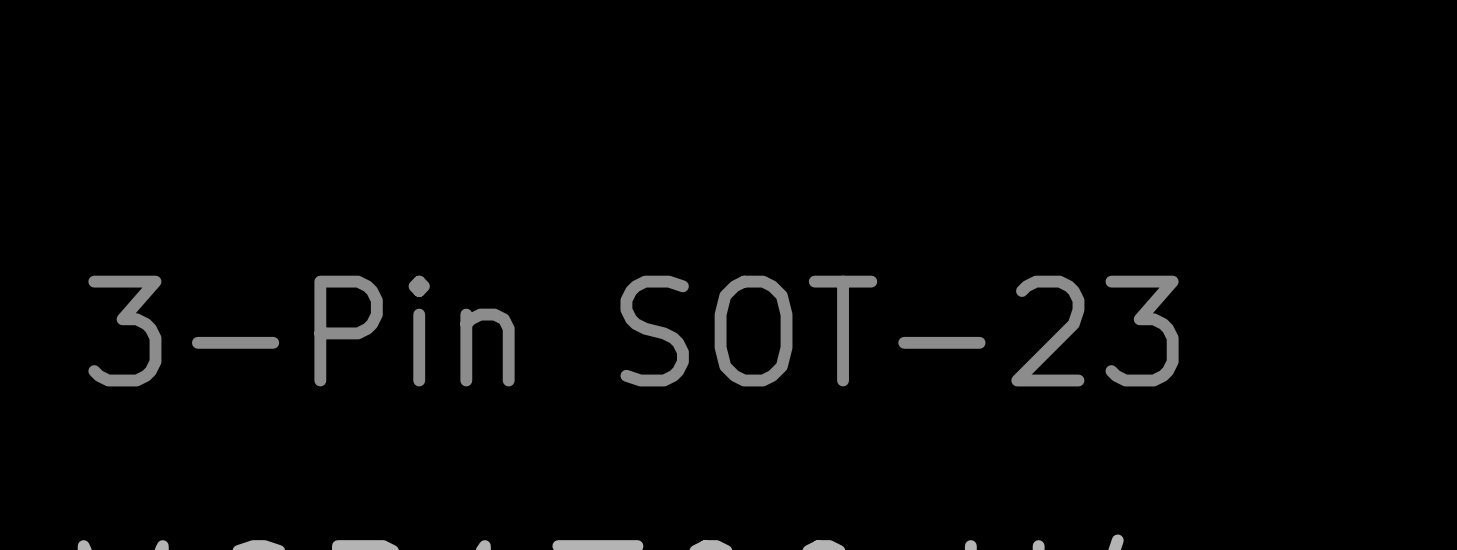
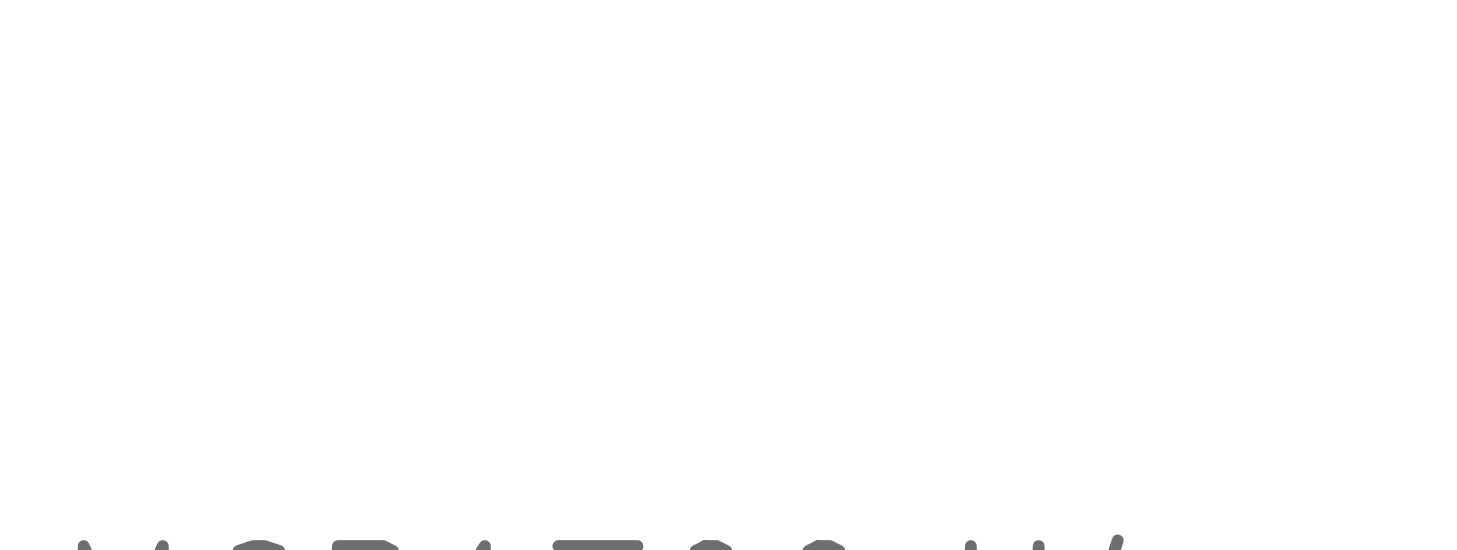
text: 3-Pin SOT-23 (633, 331) -> none

